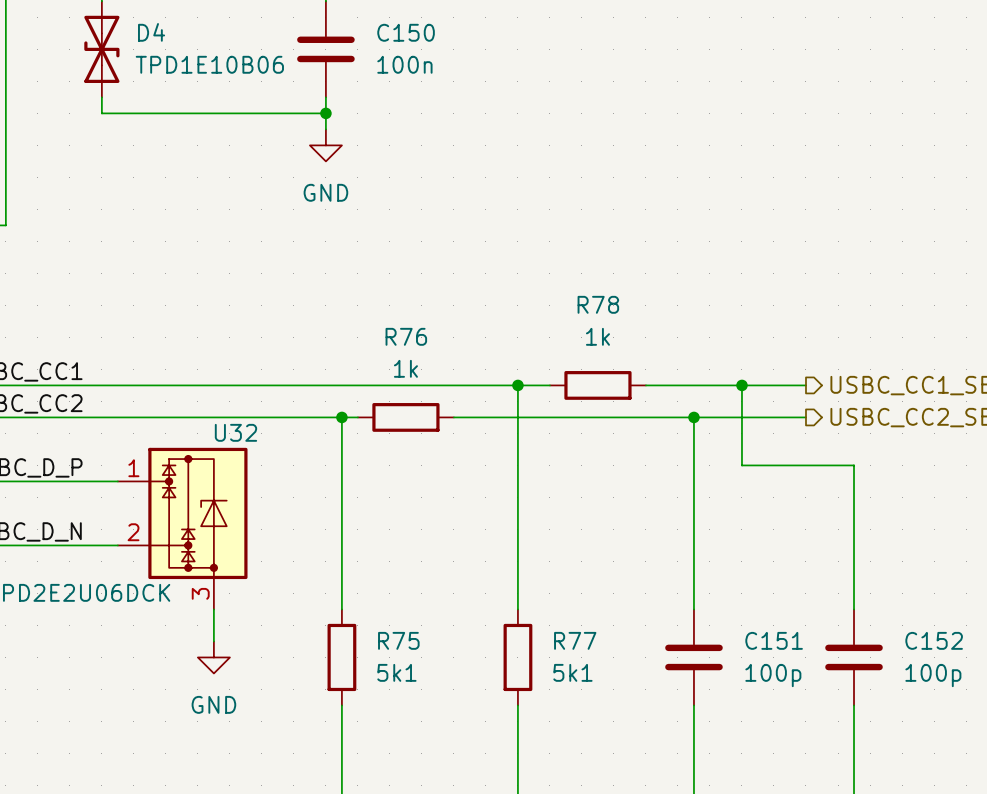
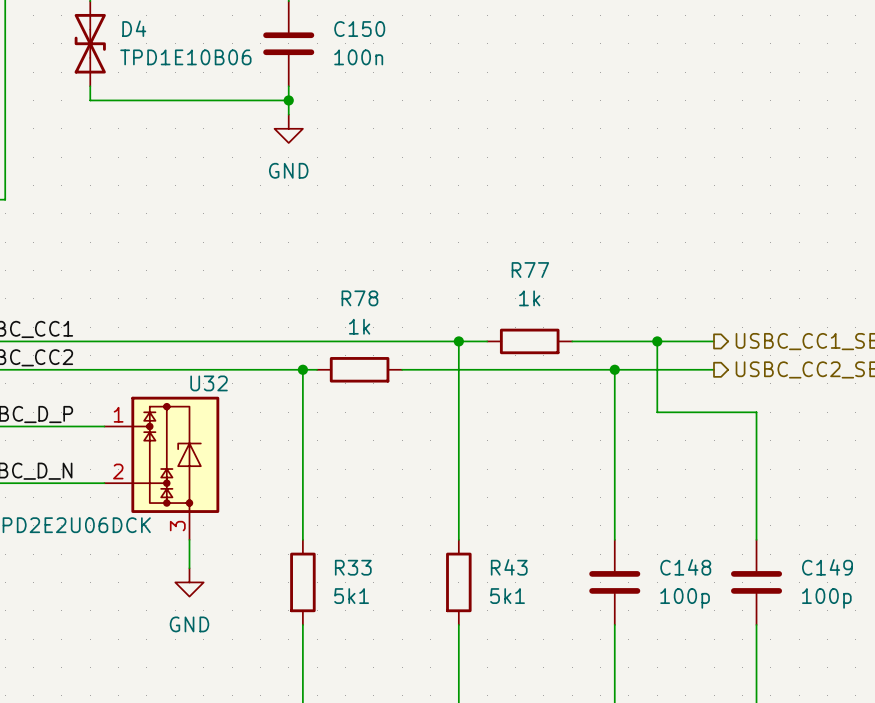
R78 name: R78 (598, 304) -> R77 (530, 270)
R76 name: R76 (406, 336) -> R78 (359, 298)
R75 name: R75 (398, 640) -> R33 (353, 567)
R77 name: R77 (575, 640) -> R43 (509, 567)
C151 name: C151 (774, 640) -> C148 (685, 567)
C152 name: C152 (934, 640) -> C149 (827, 567)

